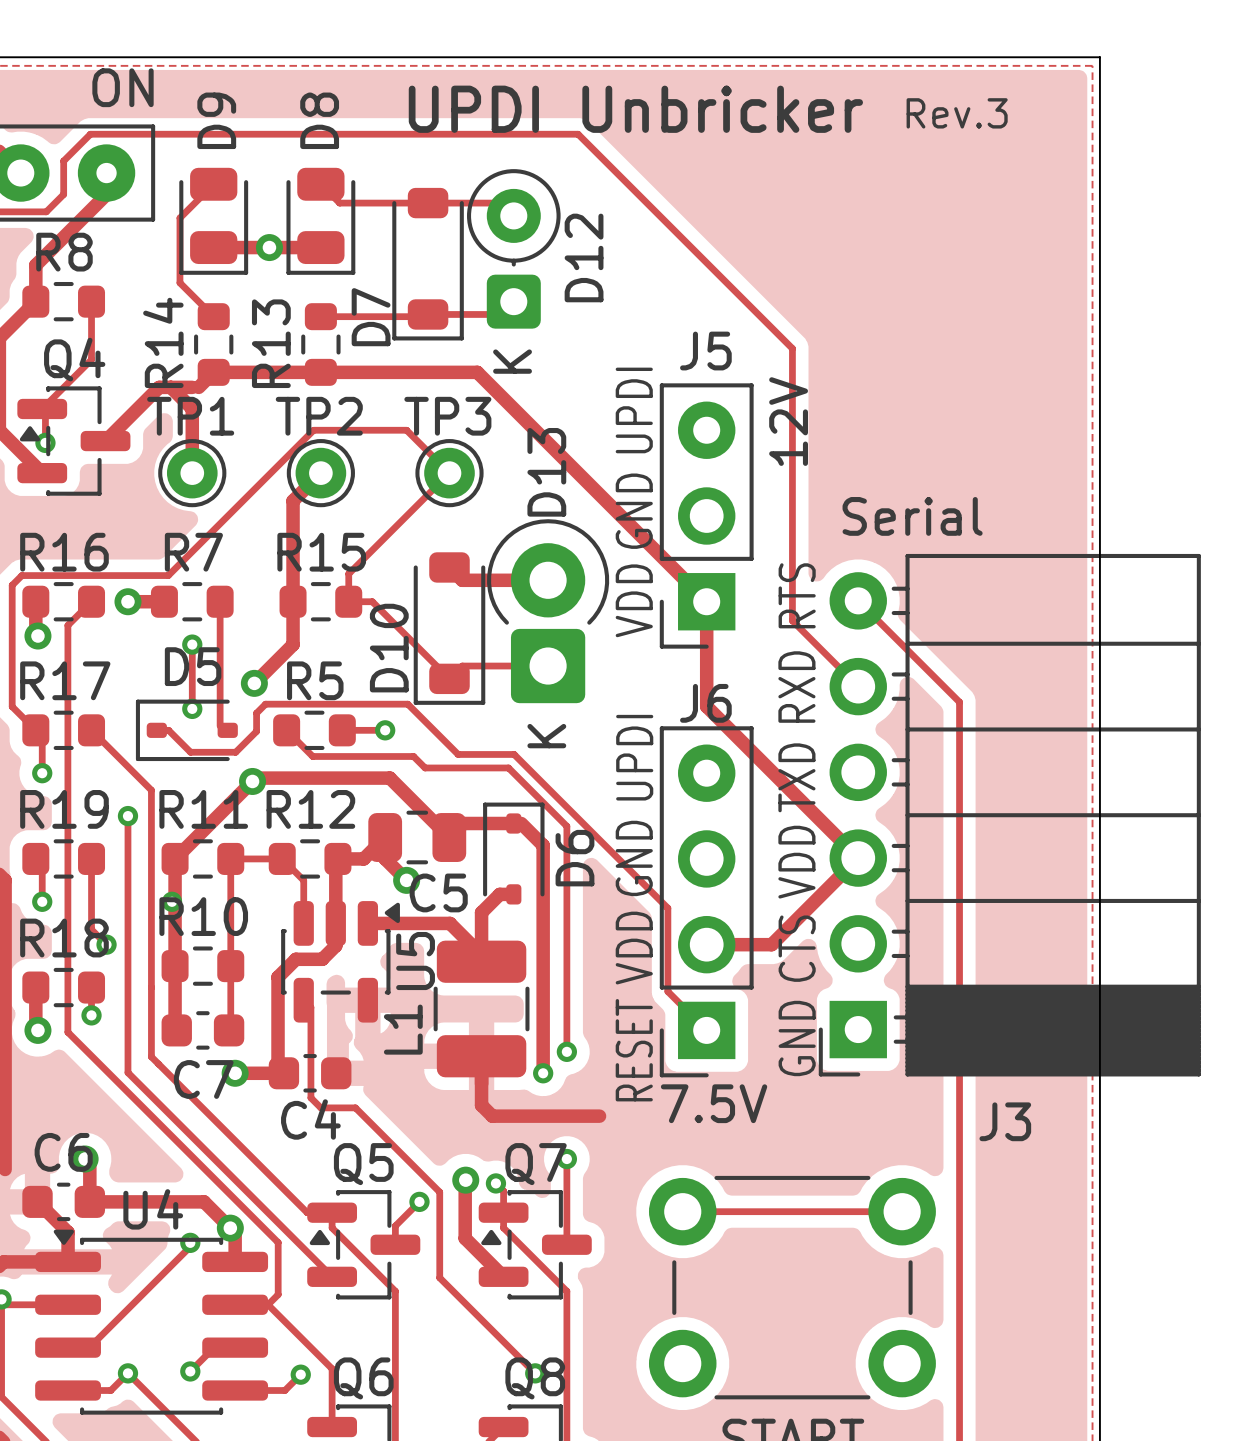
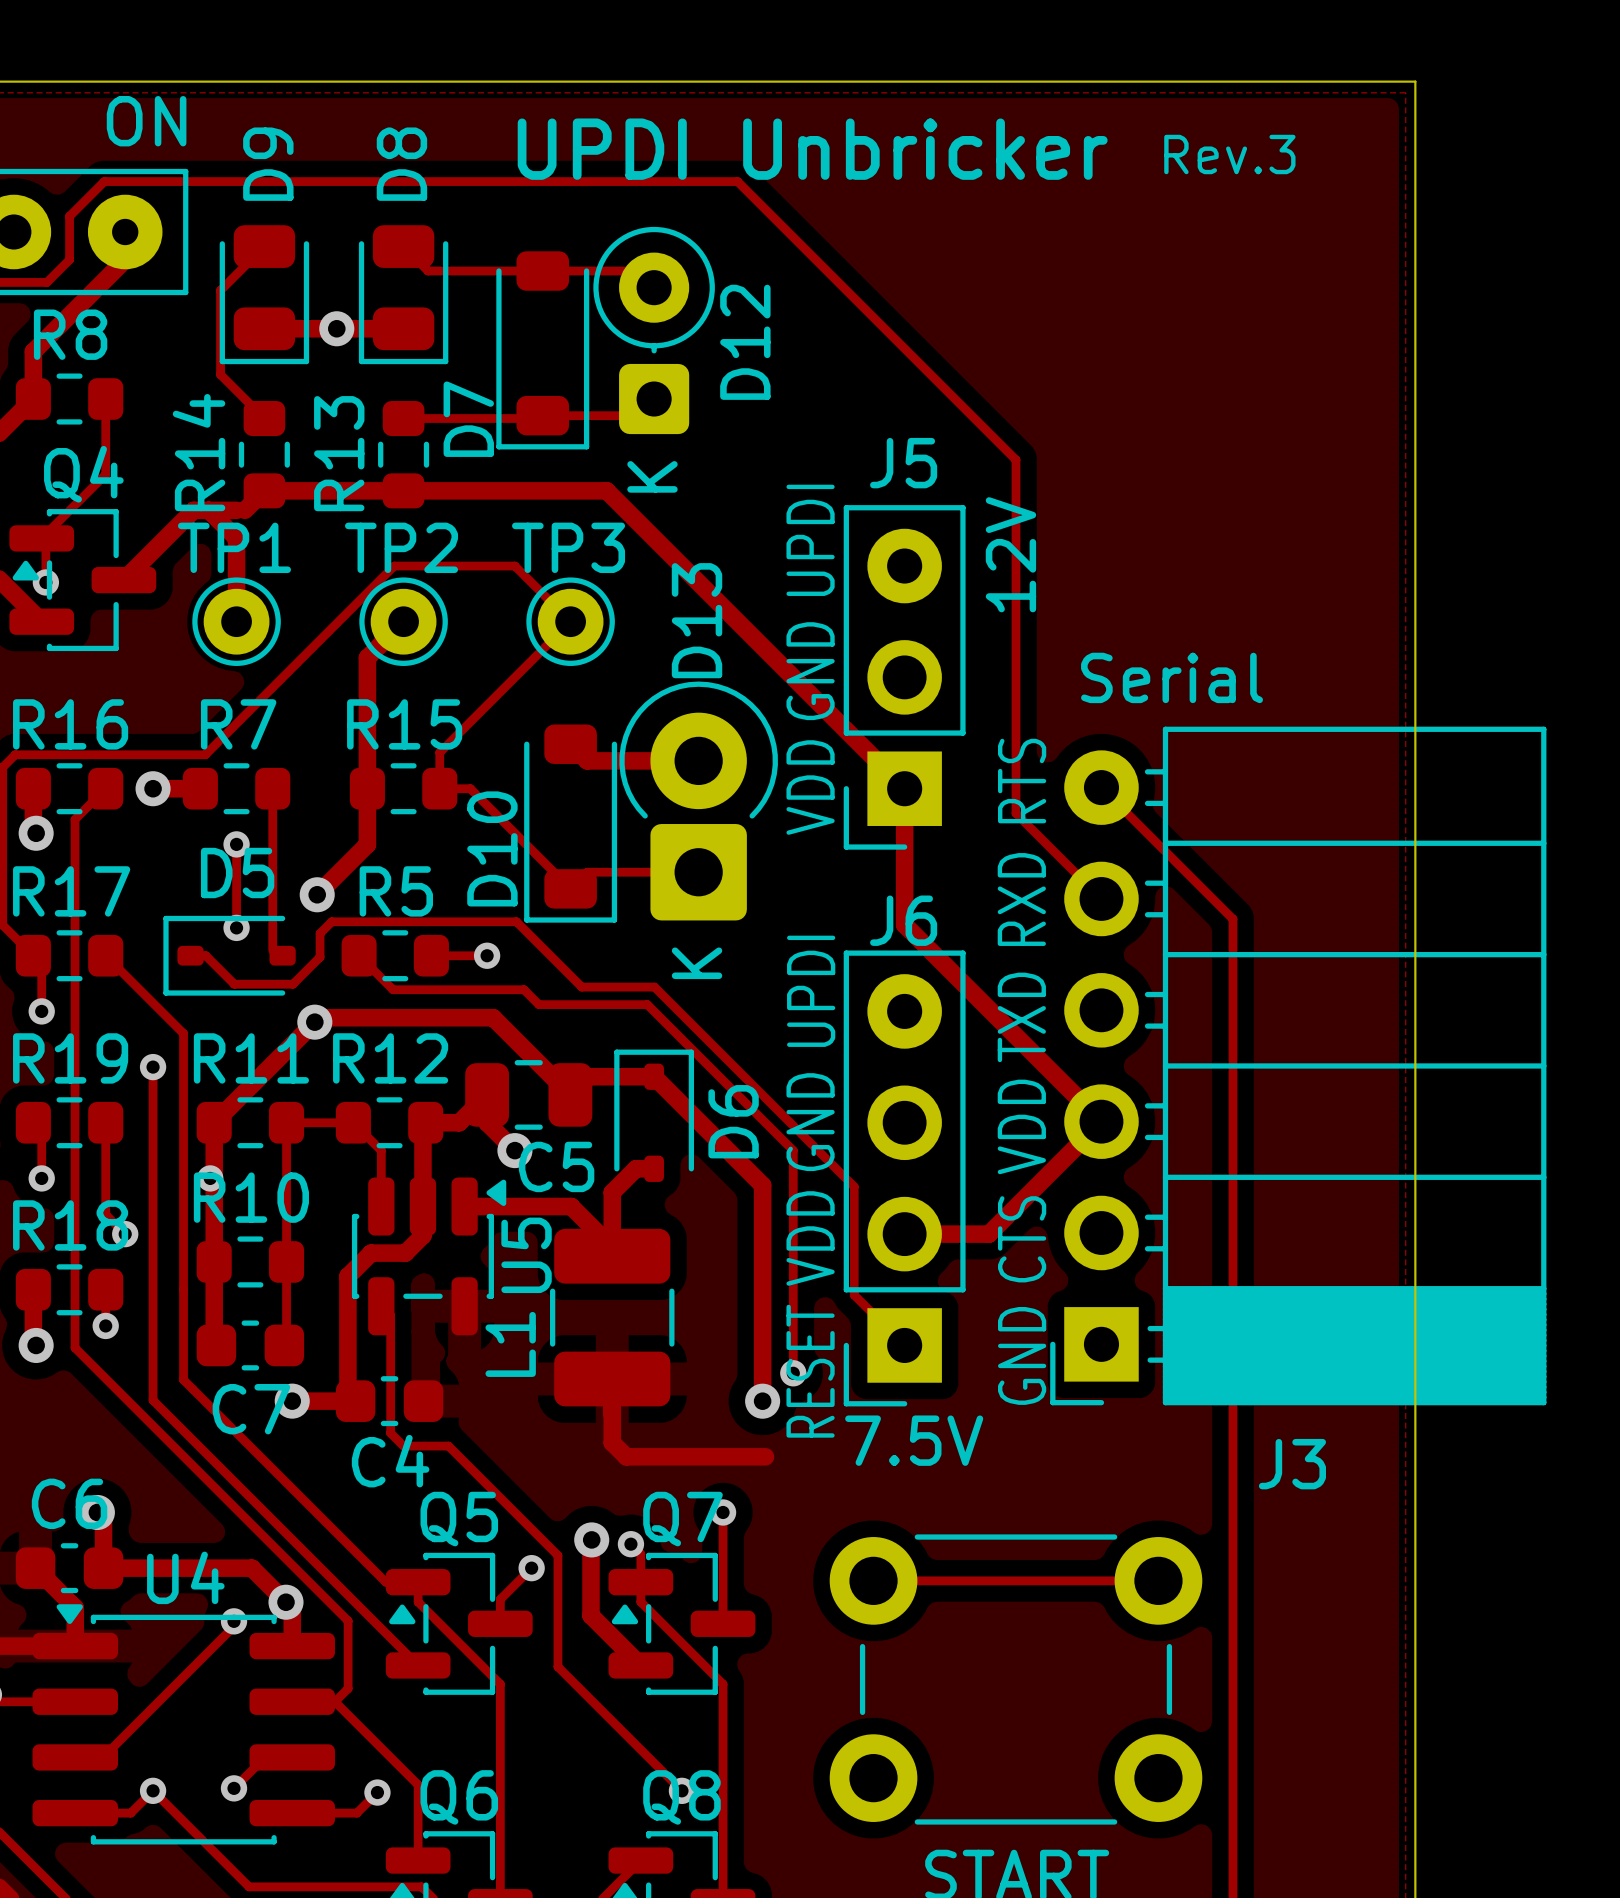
track: (513, 823) (521, 823) (543, 845) (543, 1073) -> (654, 1076) (762, 1185) (762, 1401)
track: (566, 826) (566, 1051) -> (723, 1080) (793, 1150) (793, 1373)
via: (566, 1051) -> none
via: none -> (793, 1373)
via: (543, 1073) -> none
via: none -> (762, 1401)

